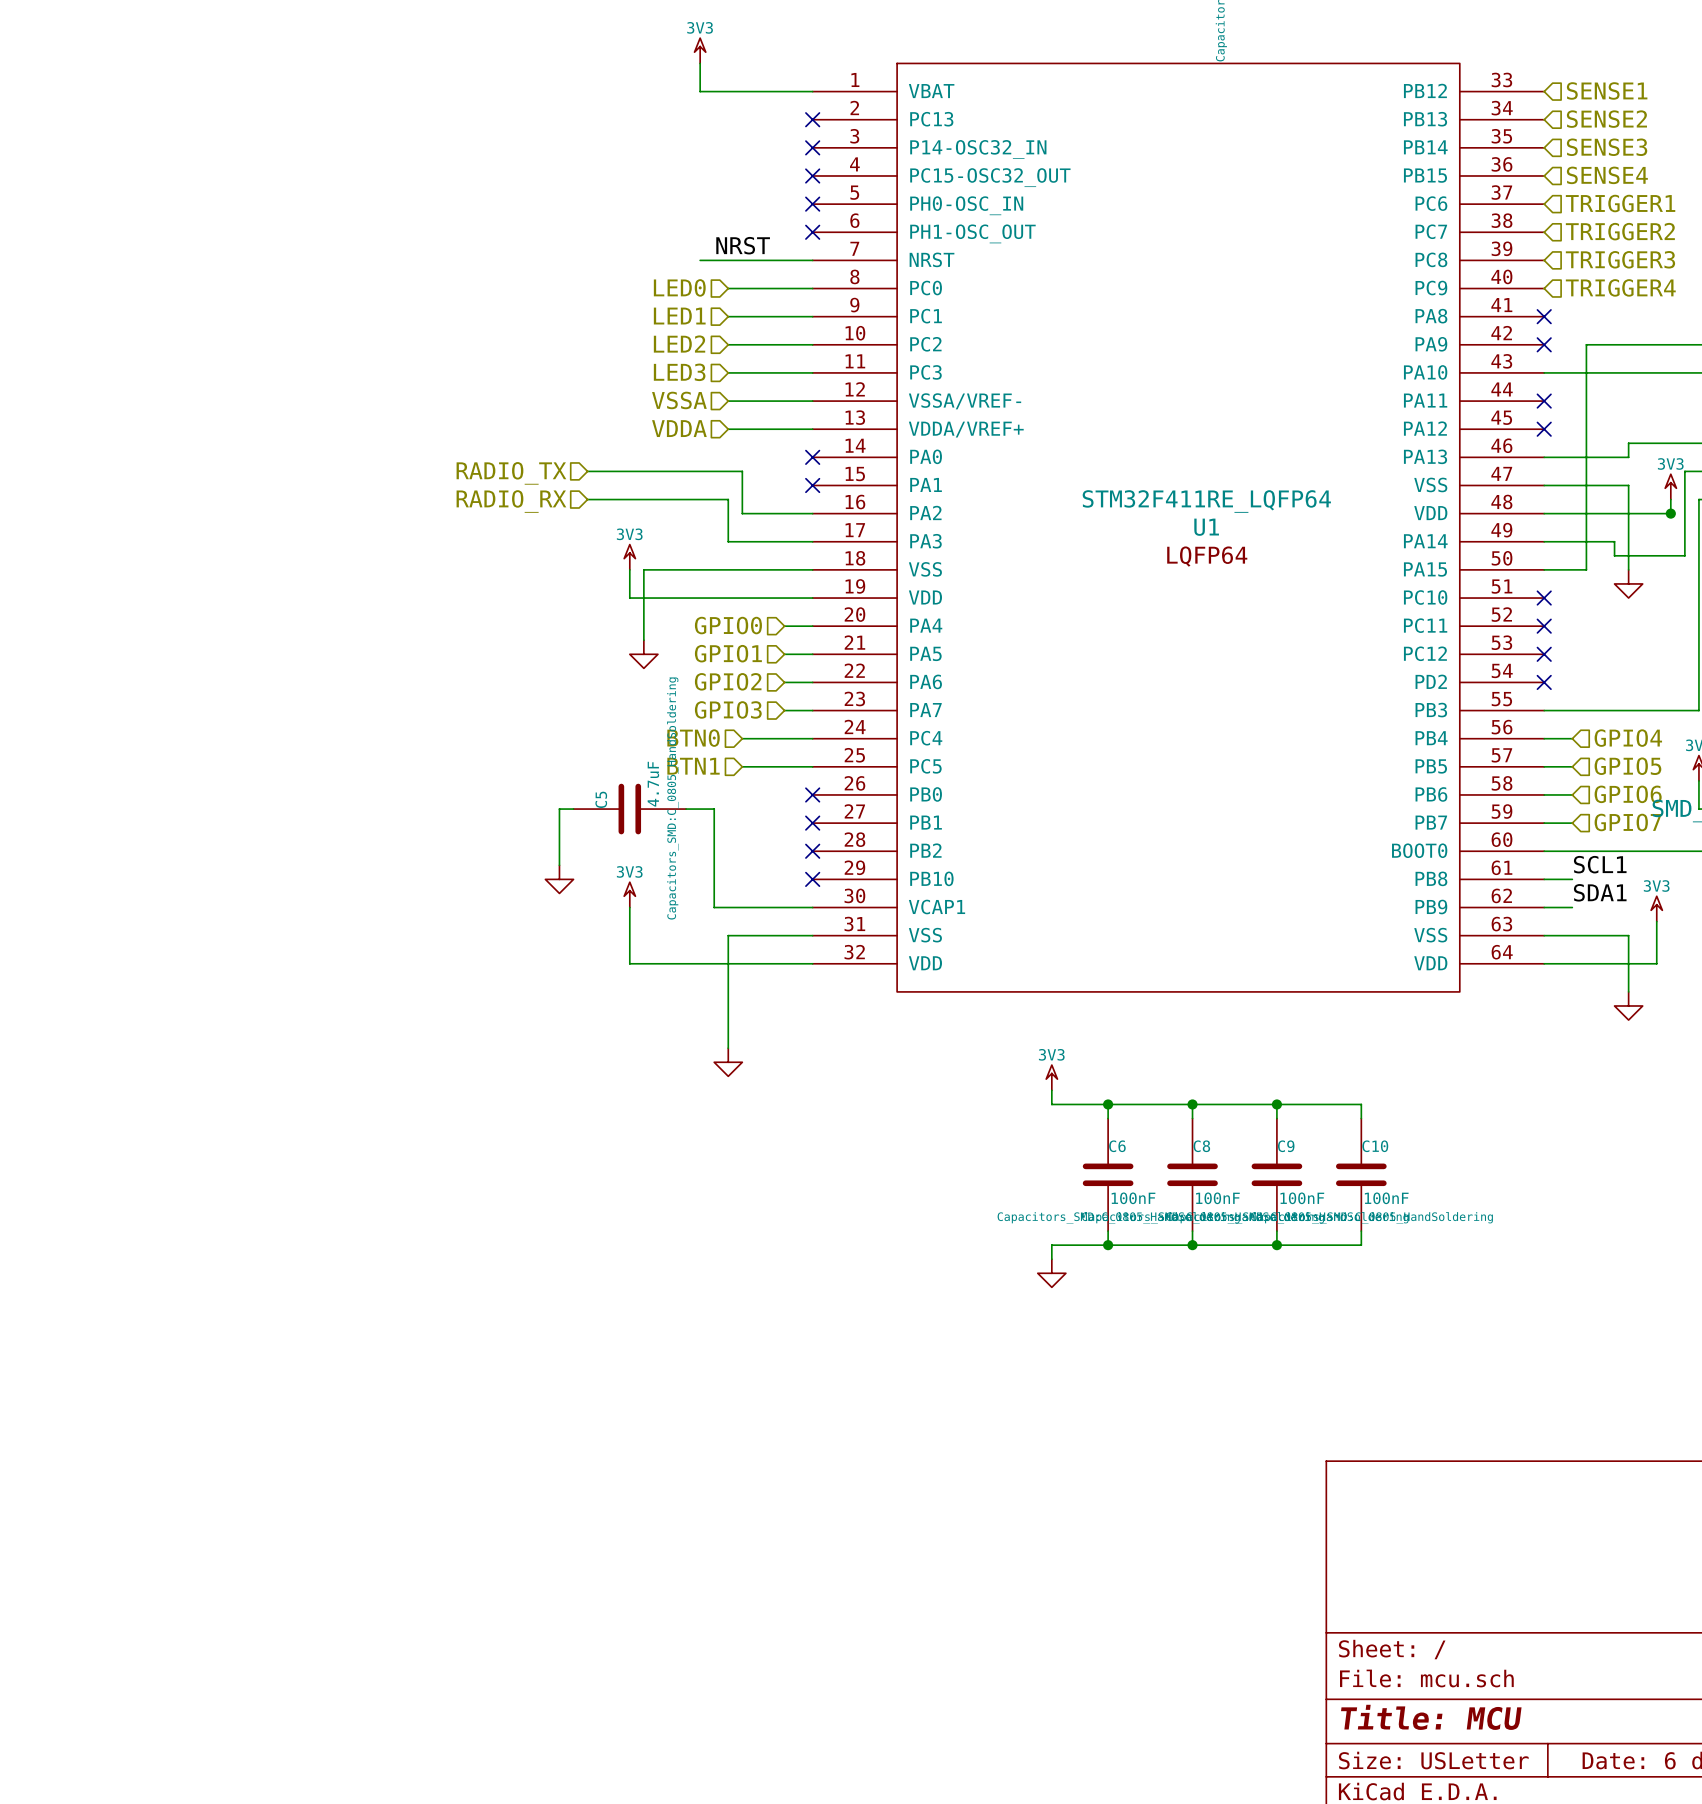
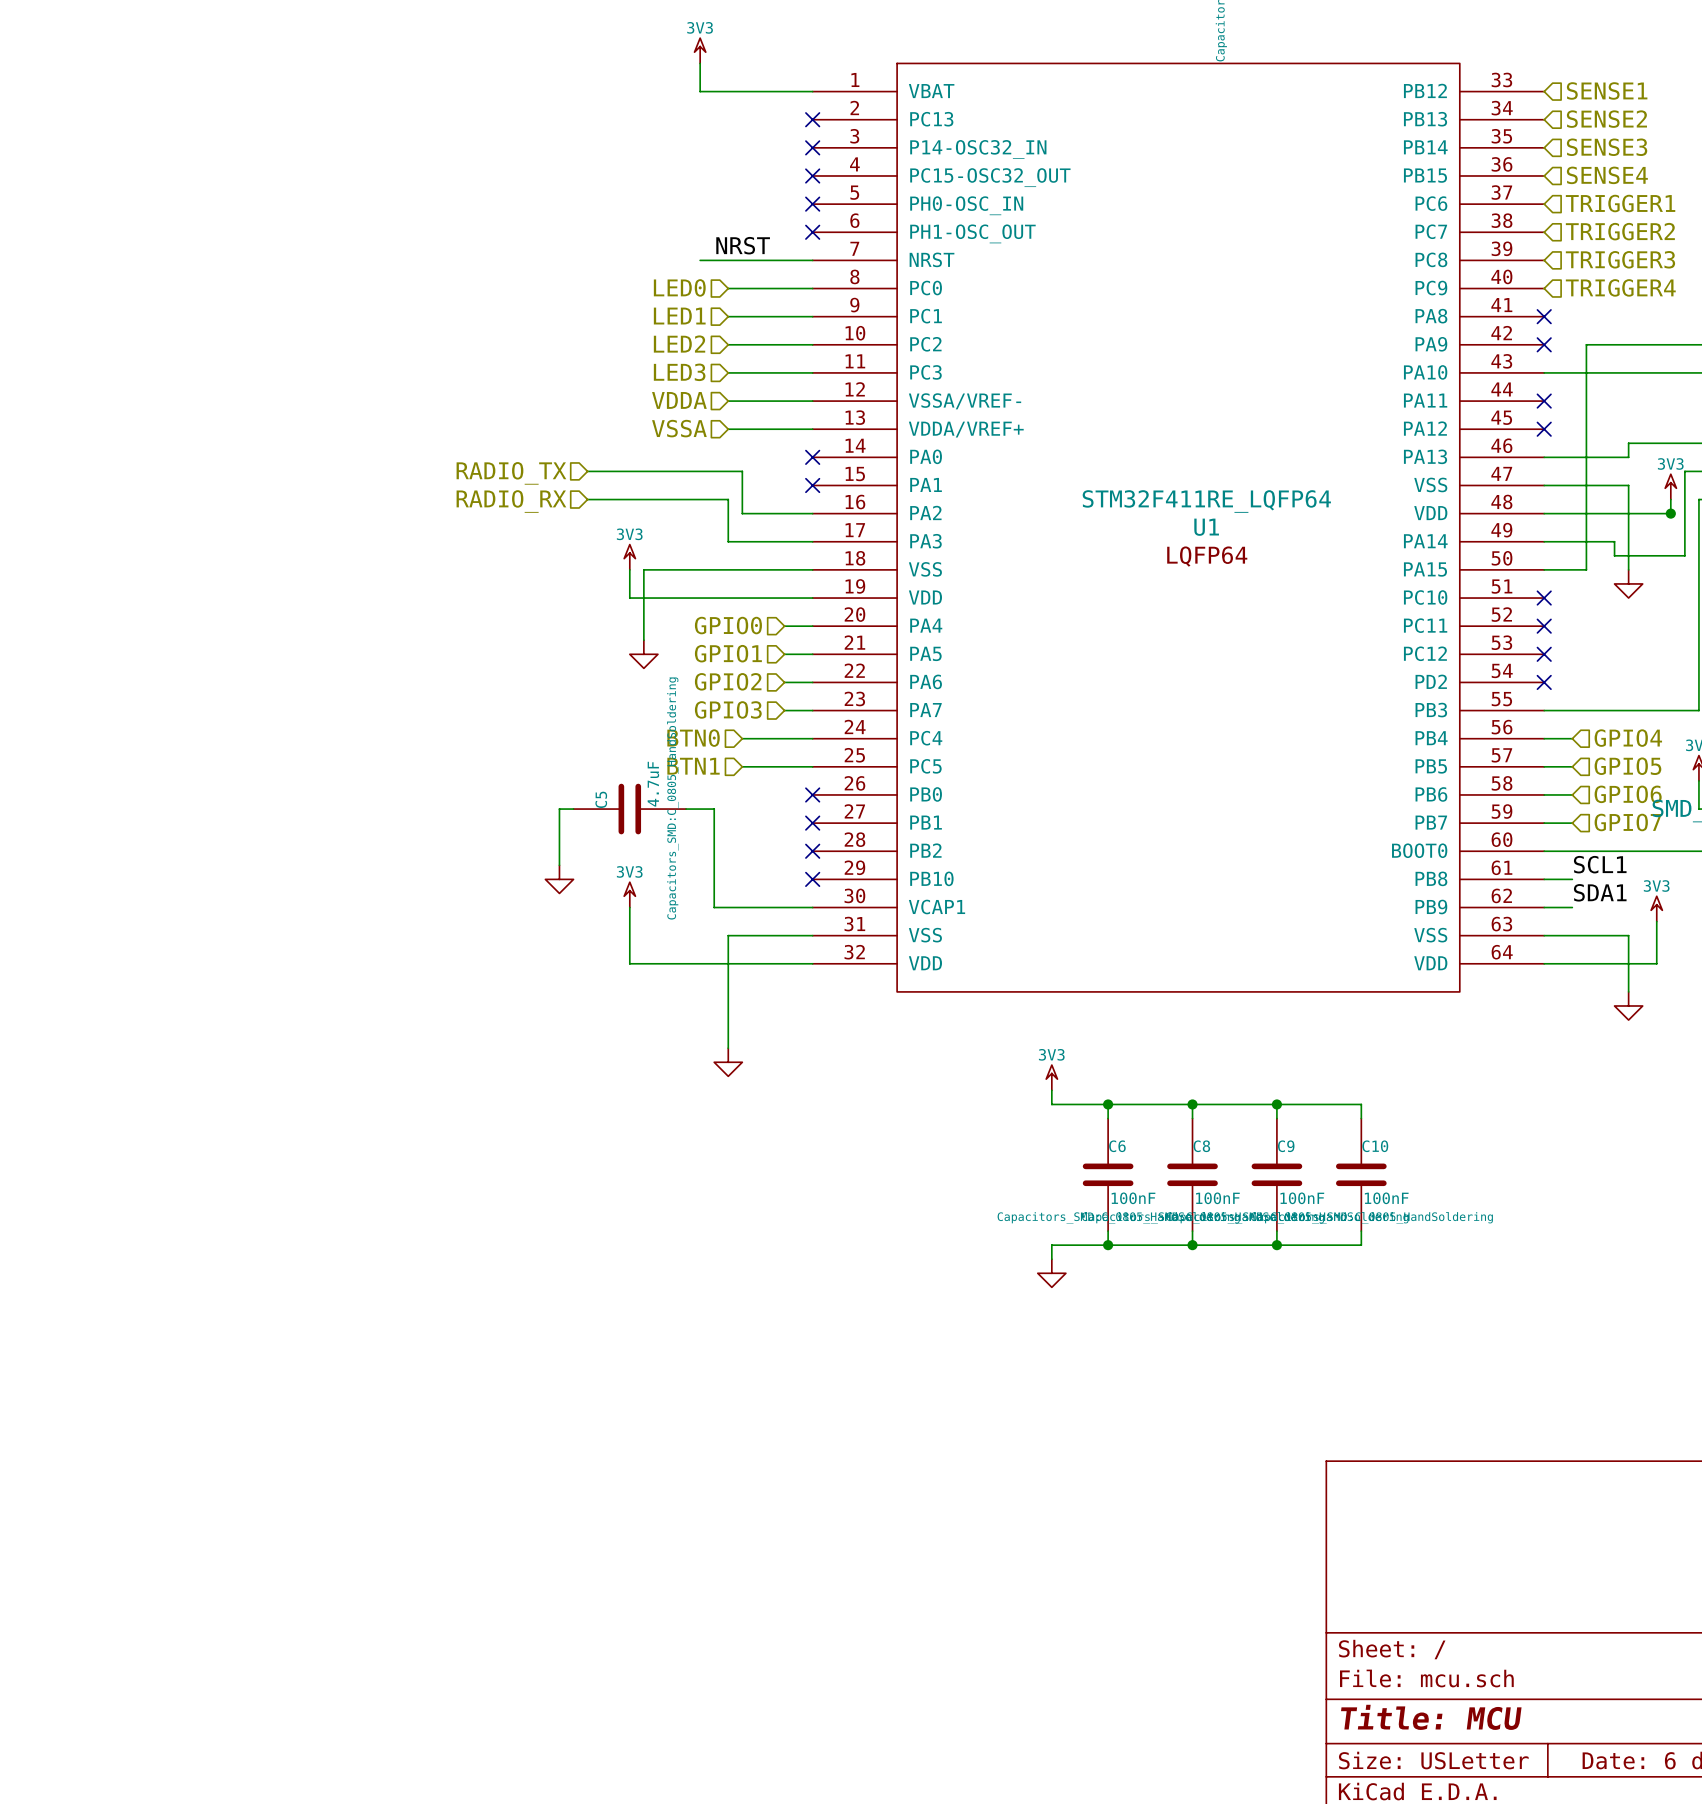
hierarchical label: VSSA (679, 400) -> VDDA (679, 400)
hierarchical label: VDDA (679, 428) -> VSSA (679, 428)

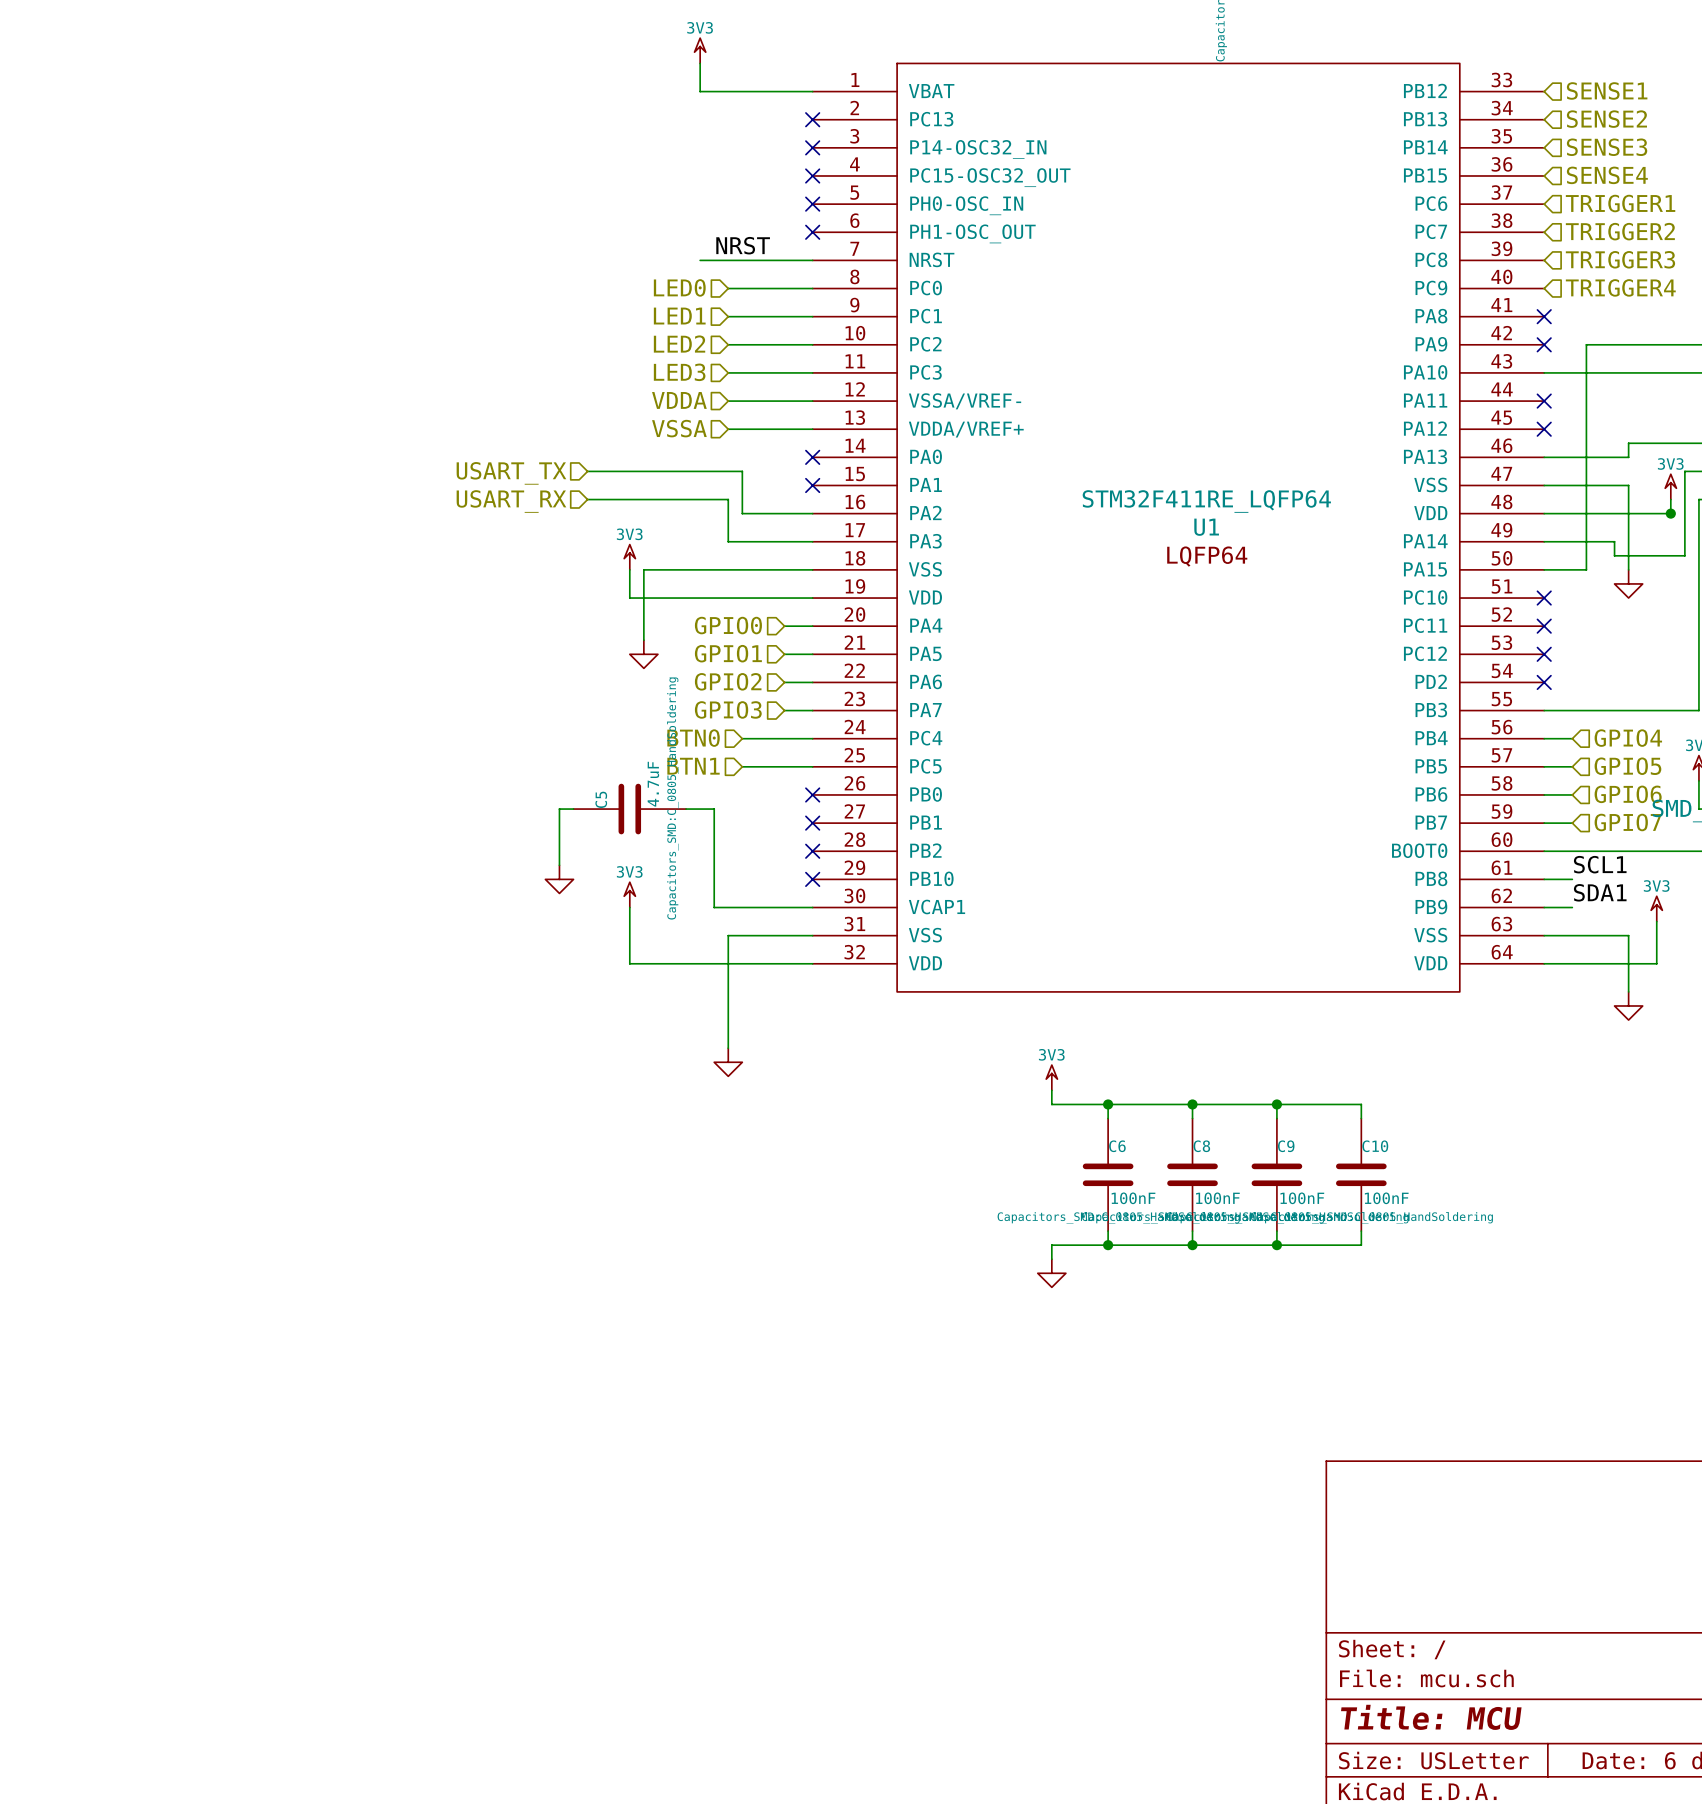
hierarchical label: RADIO_TX (511, 473) -> USART_TX (511, 473)
hierarchical label: RADIO_RX (511, 501) -> USART_RX (511, 501)

